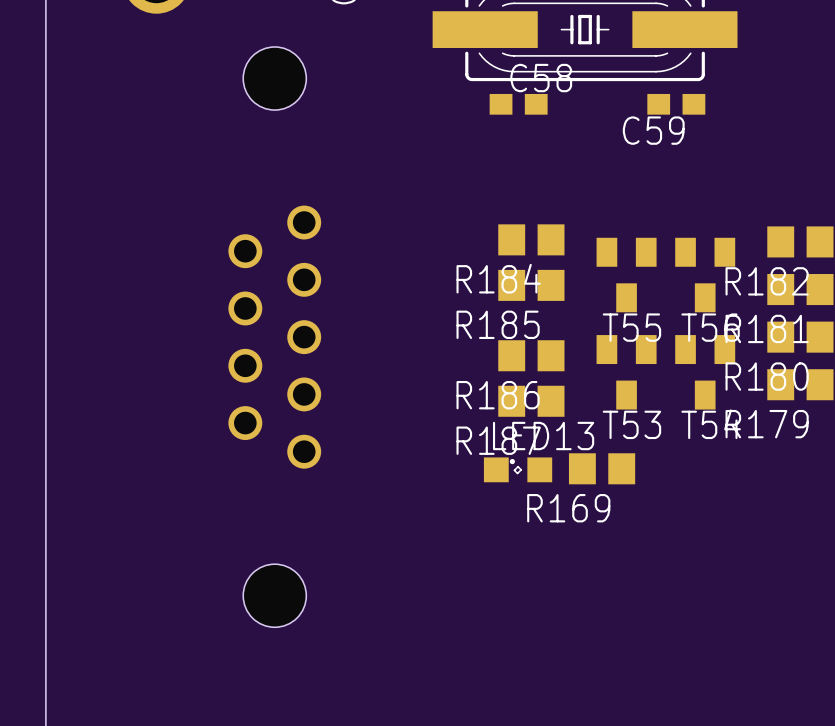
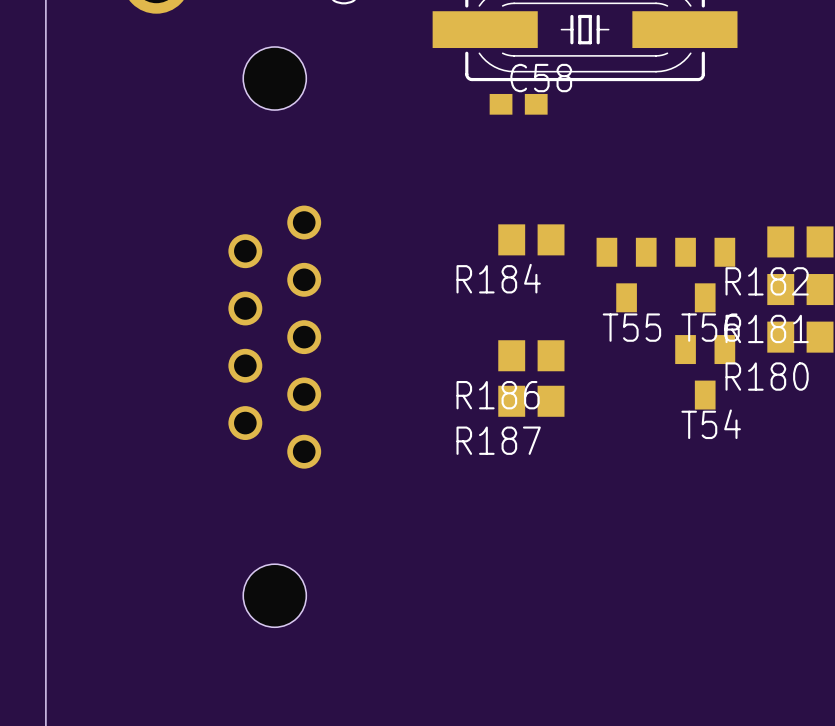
C59: (676, 104) -> none
R185: (531, 285) -> none
T53: (626, 372) -> none
R179: (800, 384) -> none
R169: (602, 468) -> none
LED13: (518, 469) -> none

